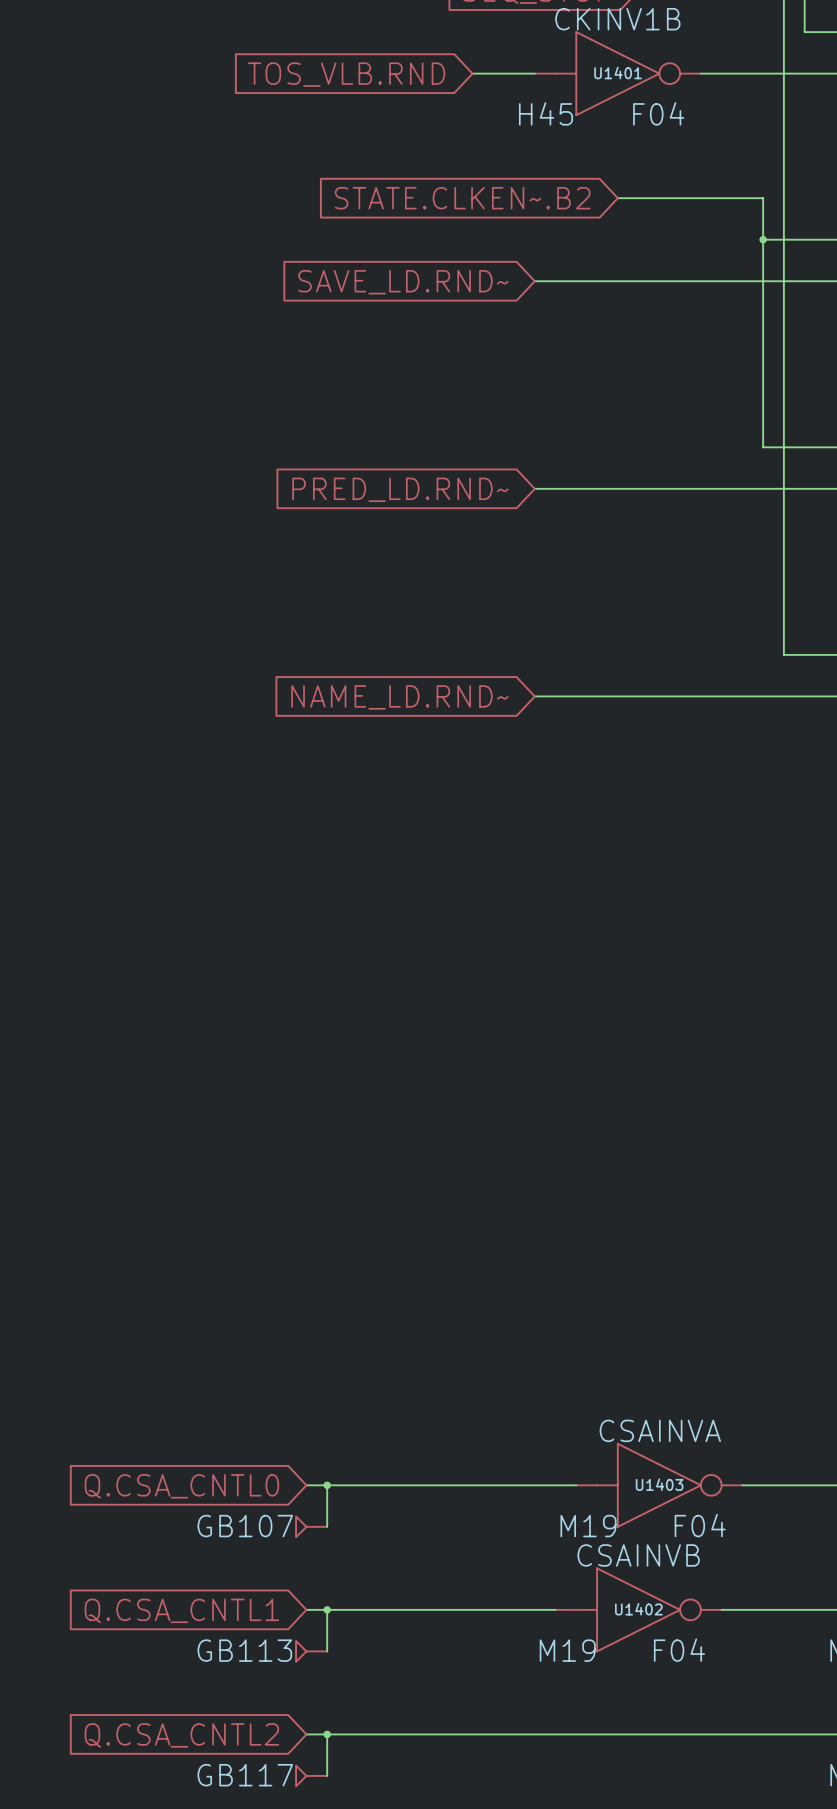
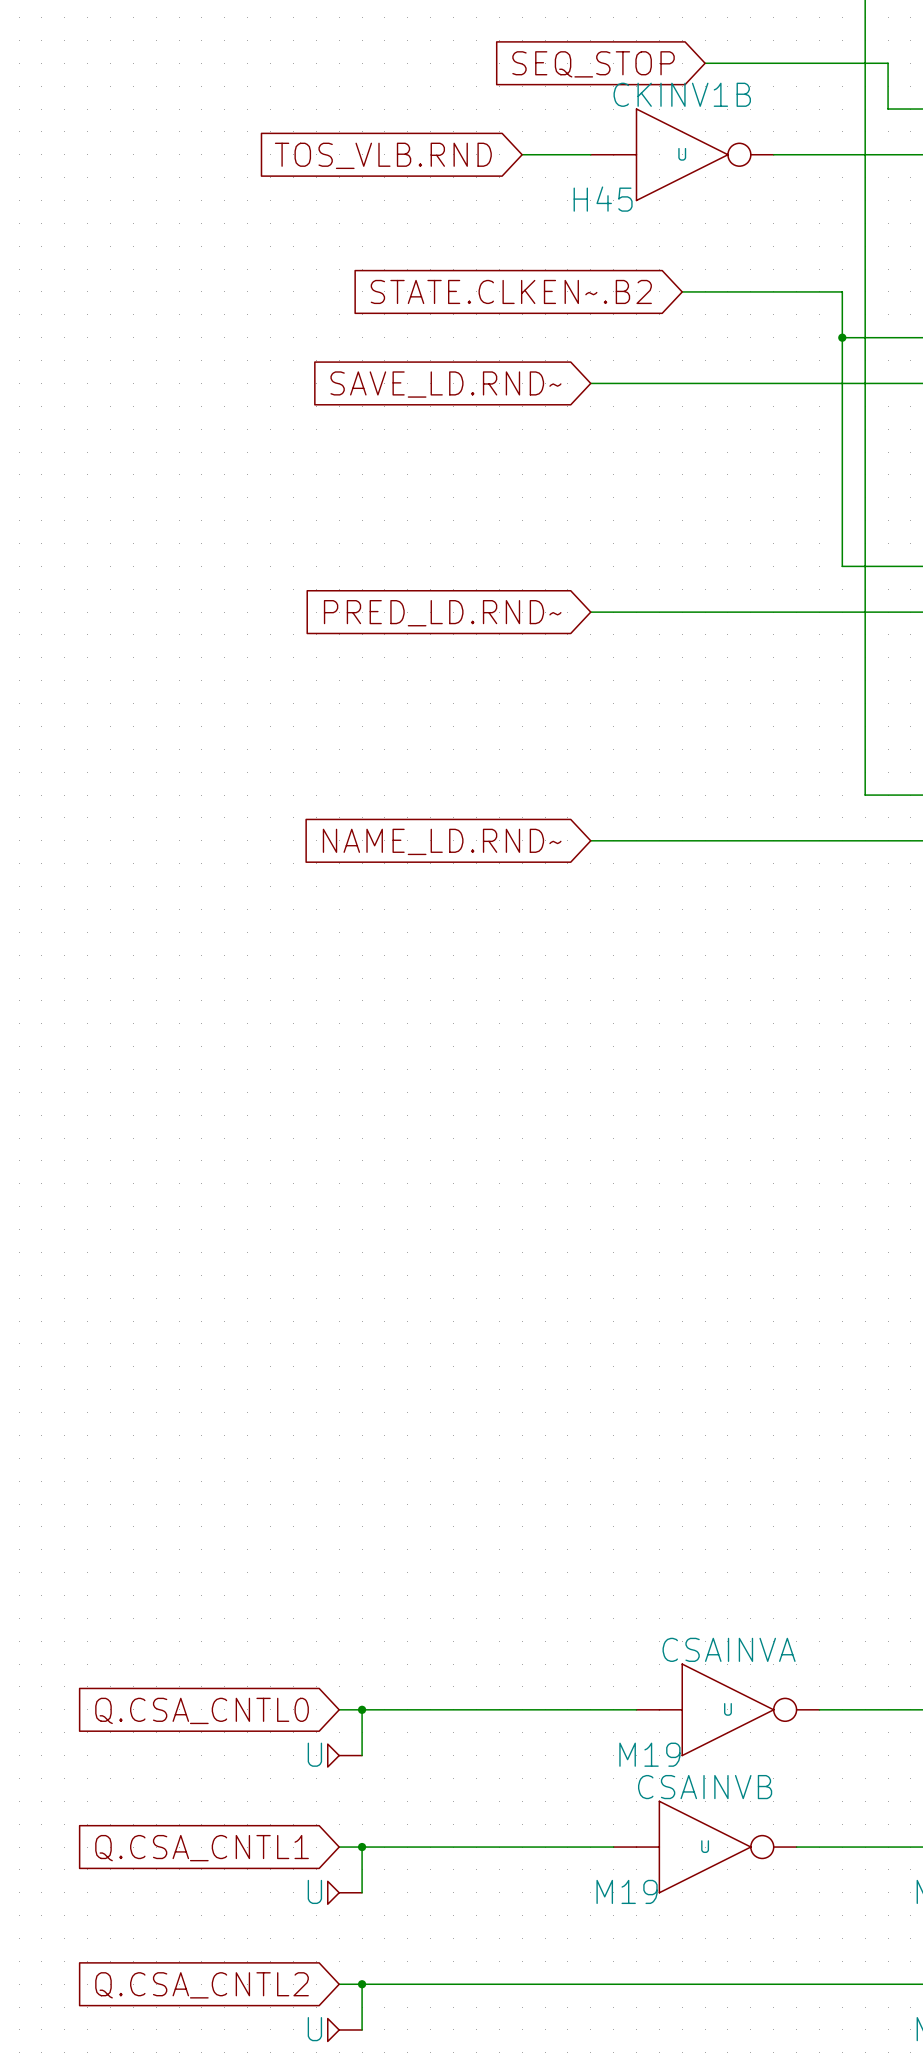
U1401 name: U1401 (618, 73) -> U (682, 154)
U1401 value: F04 (658, 113) -> none
U1403 name: U1403 (659, 1484) -> U (727, 1709)
U1403 value: F04 (700, 1525) -> none
GB107 name: GB107 (245, 1526) -> U (314, 1754)
U1402 name: U1402 (638, 1609) -> U (705, 1846)
GB113 name: GB113 (244, 1650) -> U (314, 1891)
U1402 value: F04 (679, 1650) -> none
GB117 name: GB117 (245, 1775) -> U (314, 2029)

